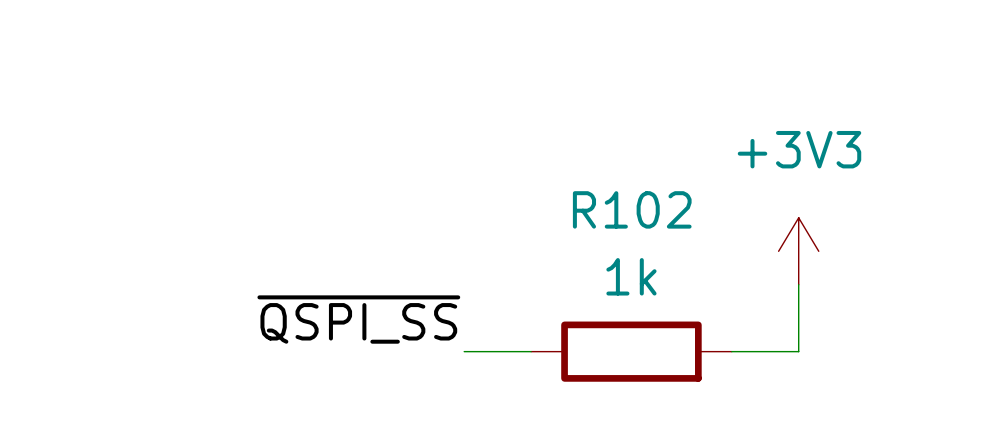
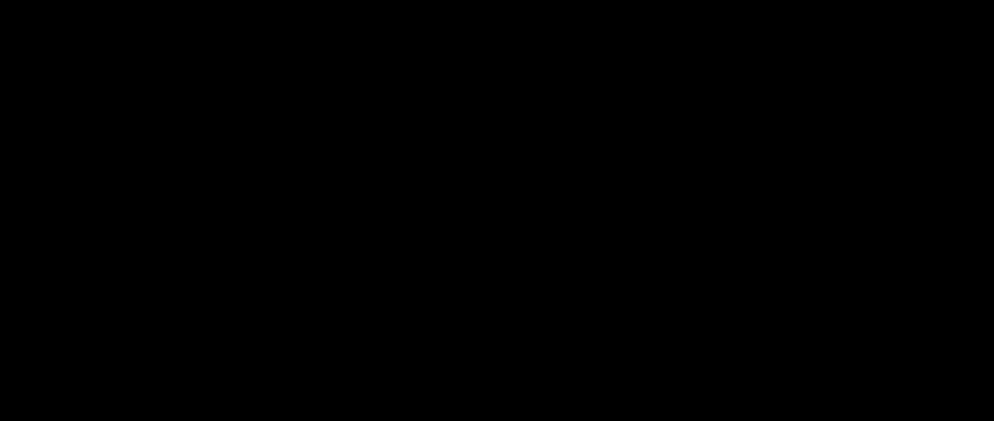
power symbol: +3V3 (798, 251) -> none
wire: (798, 284) (798, 351) (731, 351) -> none
label: ~{QSPI_SS} (358, 319) -> none
wire: (464, 351) (531, 351) -> none
R102: 1k (631, 351) -> none

